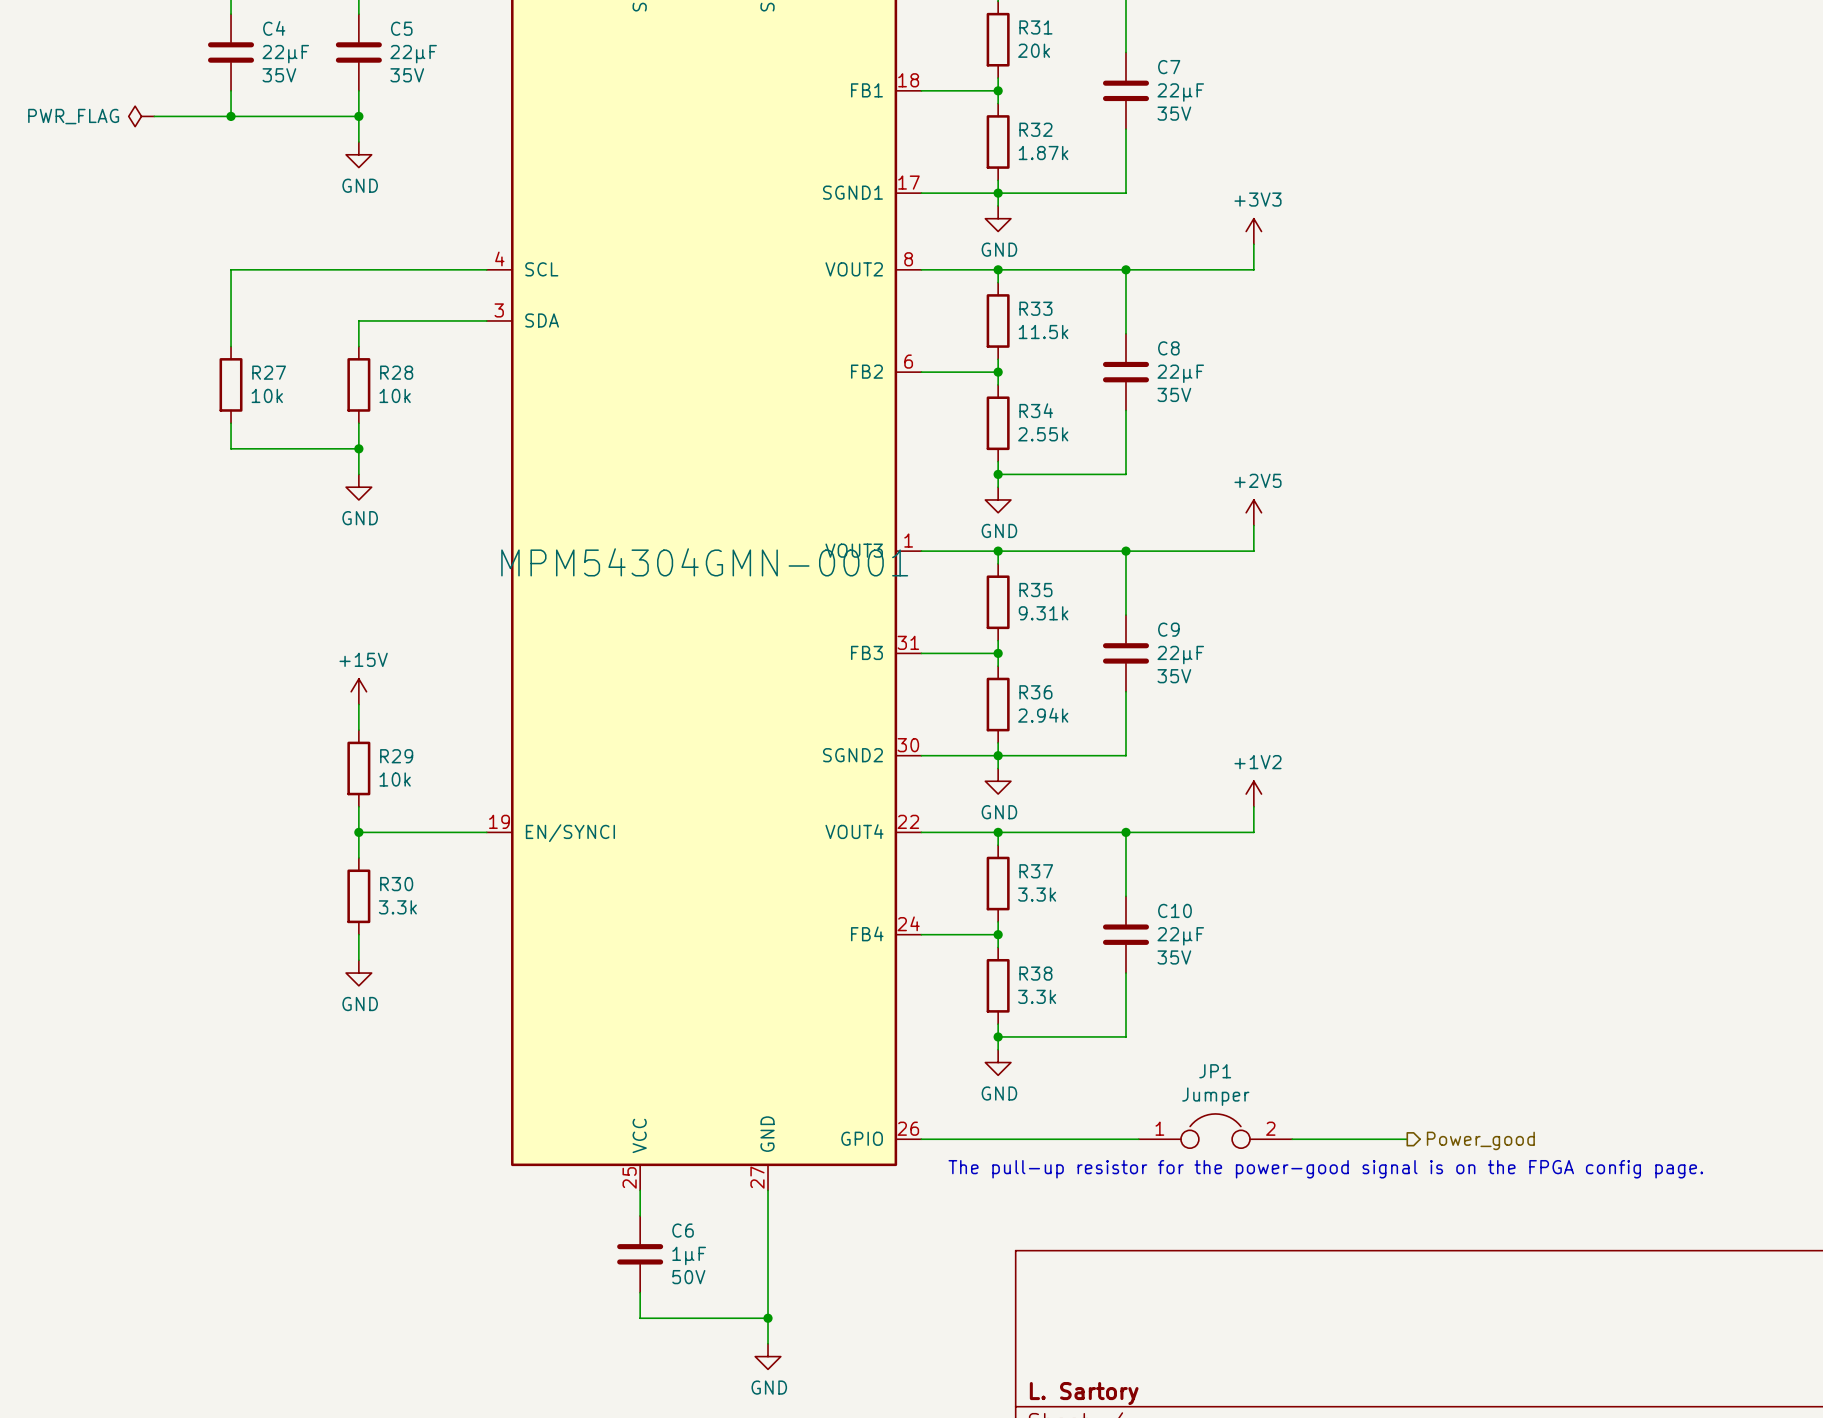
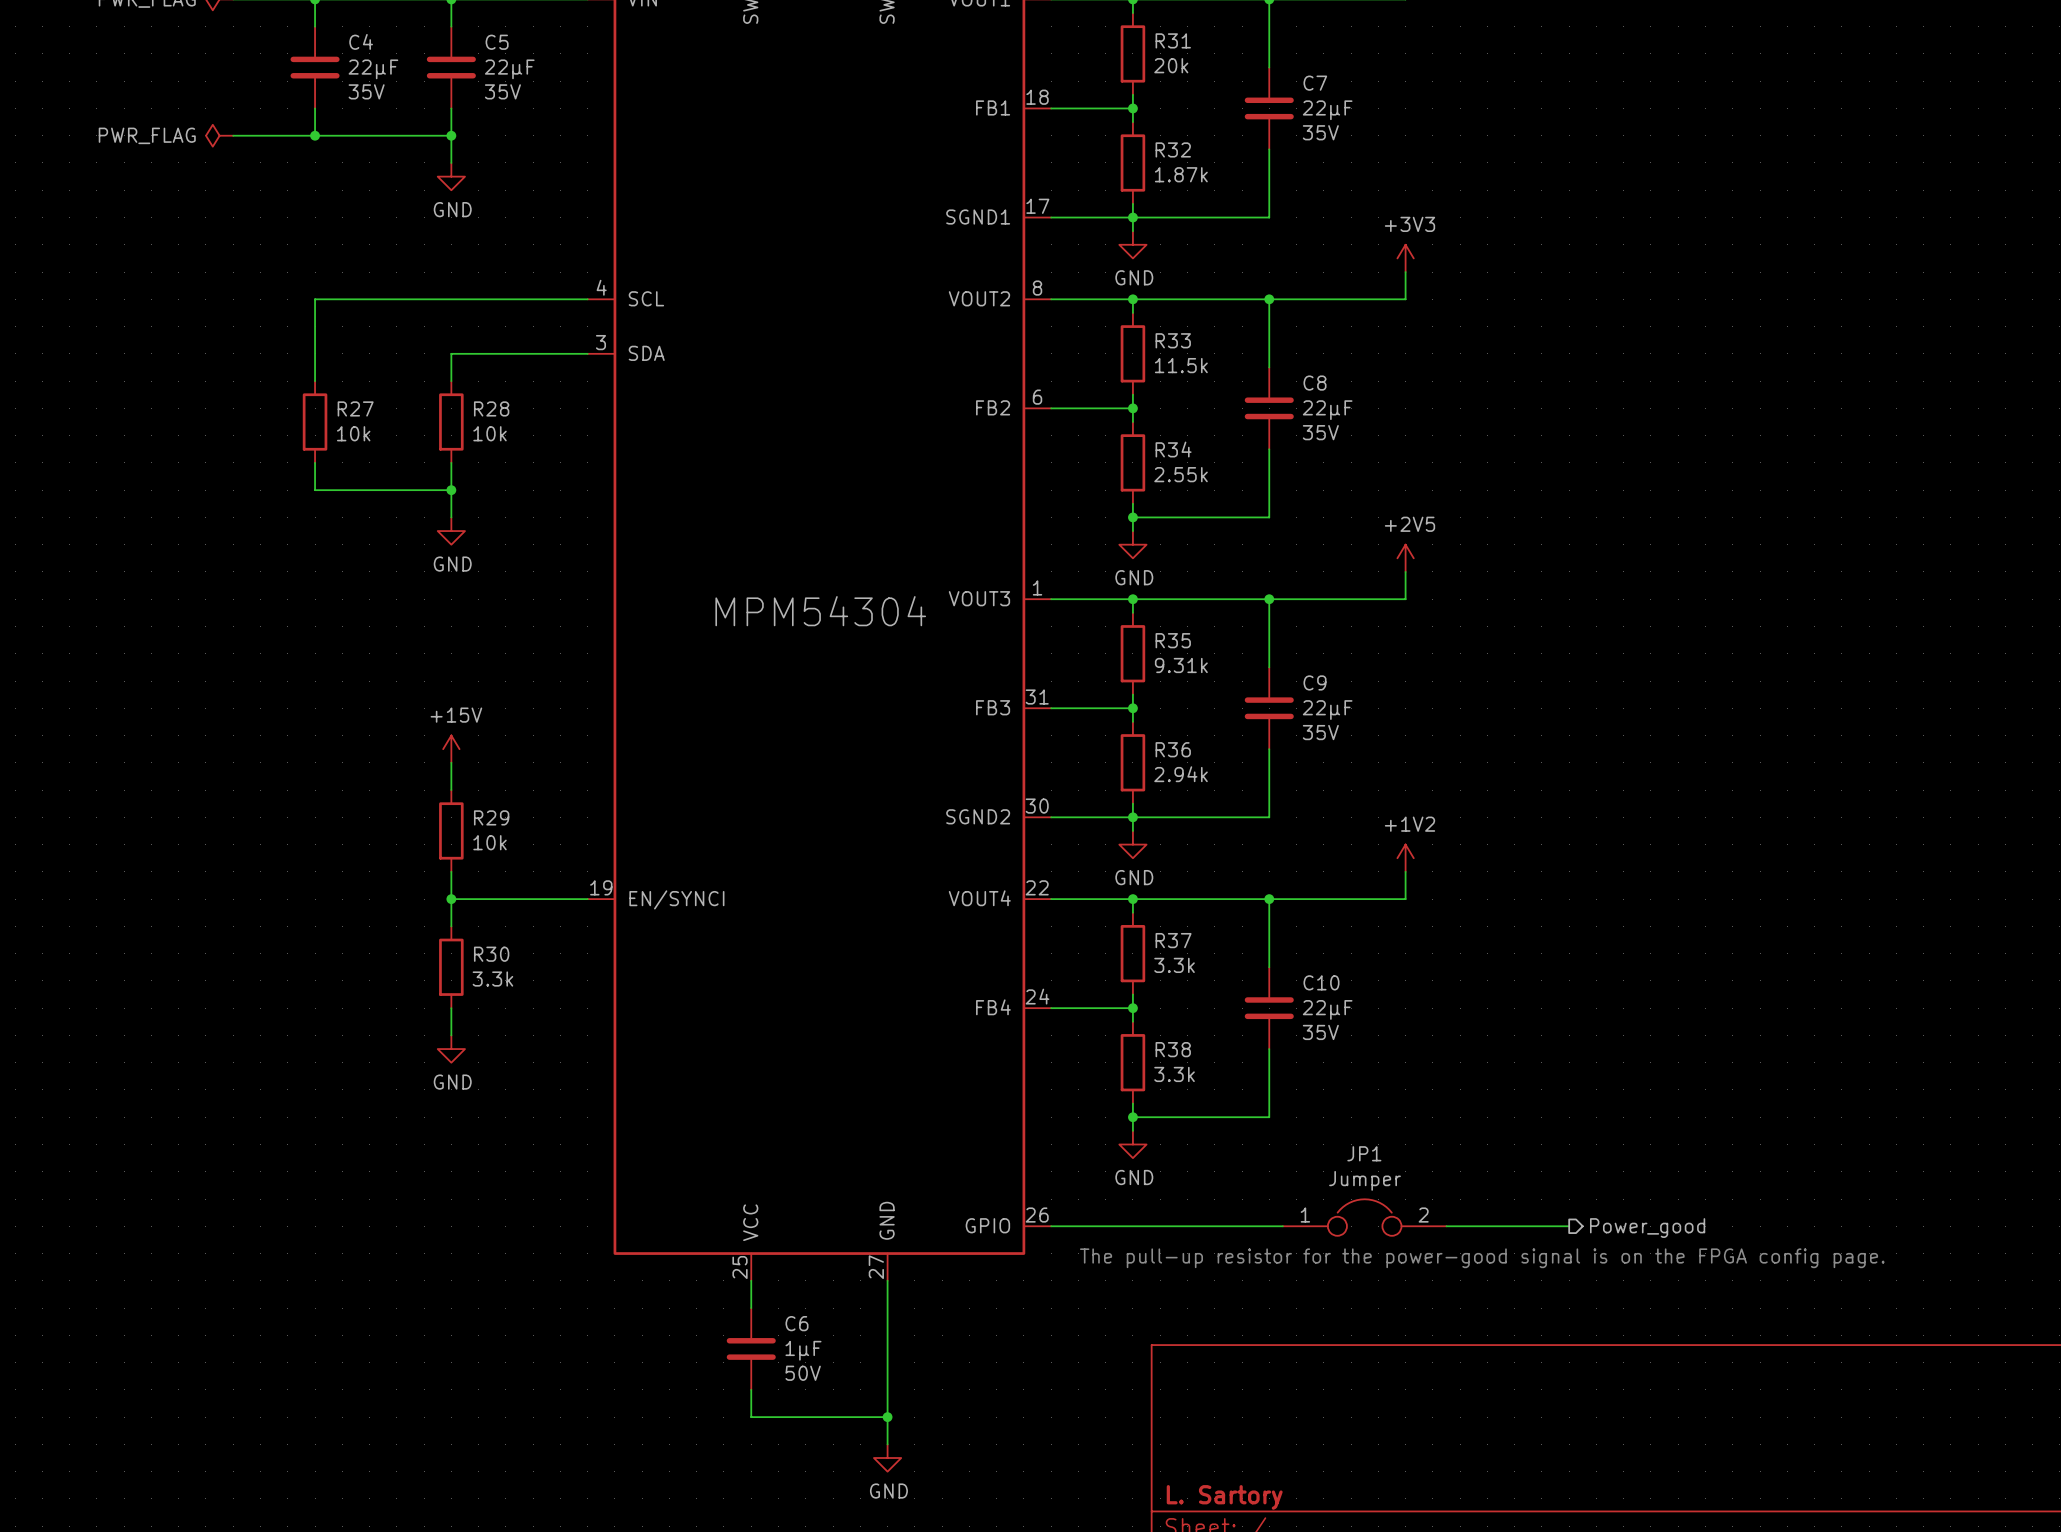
part value: MPM54304GMN-0001 (704, 562) -> MPM54304 (820, 611)

